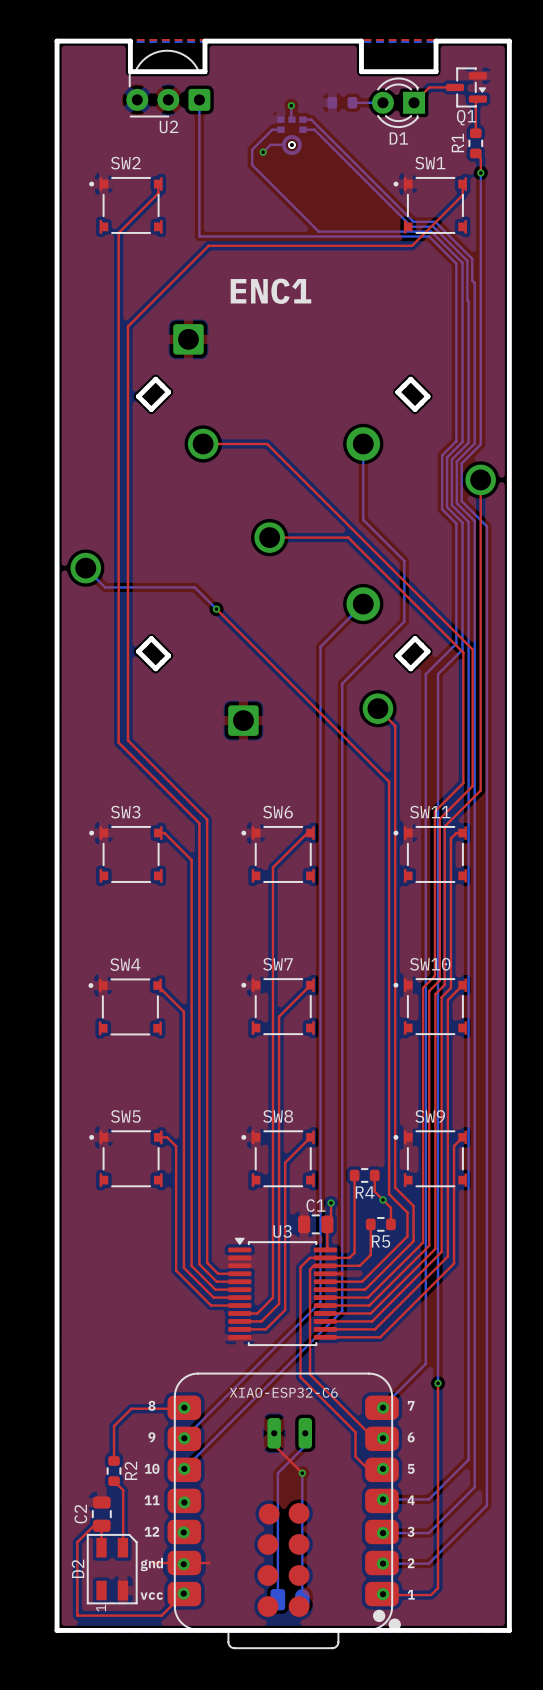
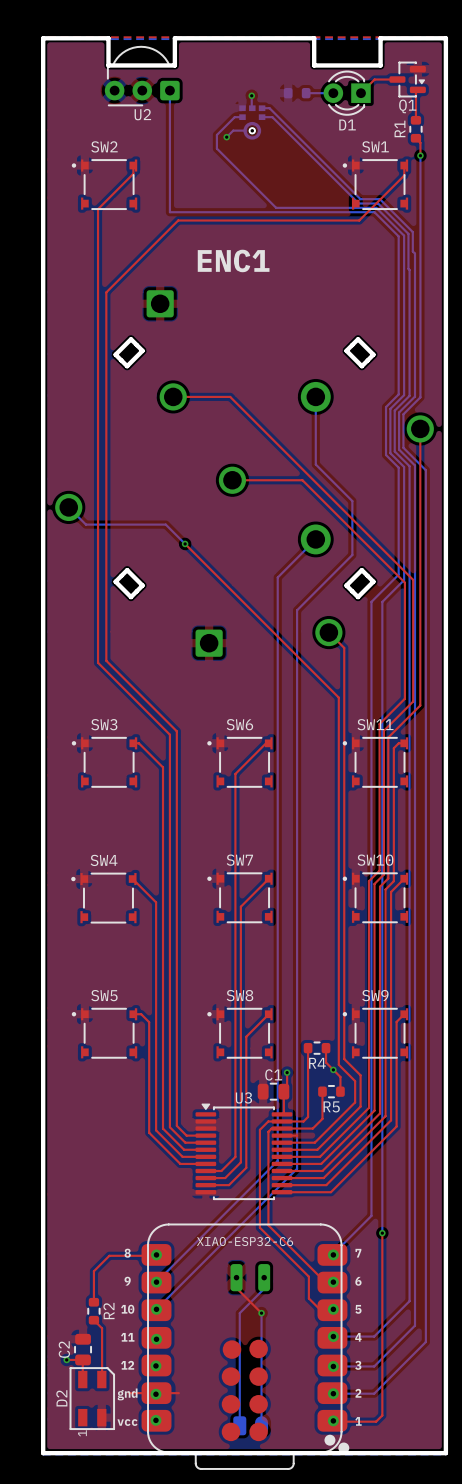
via: none -> (66, 1359)
top track: (93, 1525) (77, 1542) (77, 1615) (161, 1615) (183, 1593) -> (75, 1359) (66, 1359)

